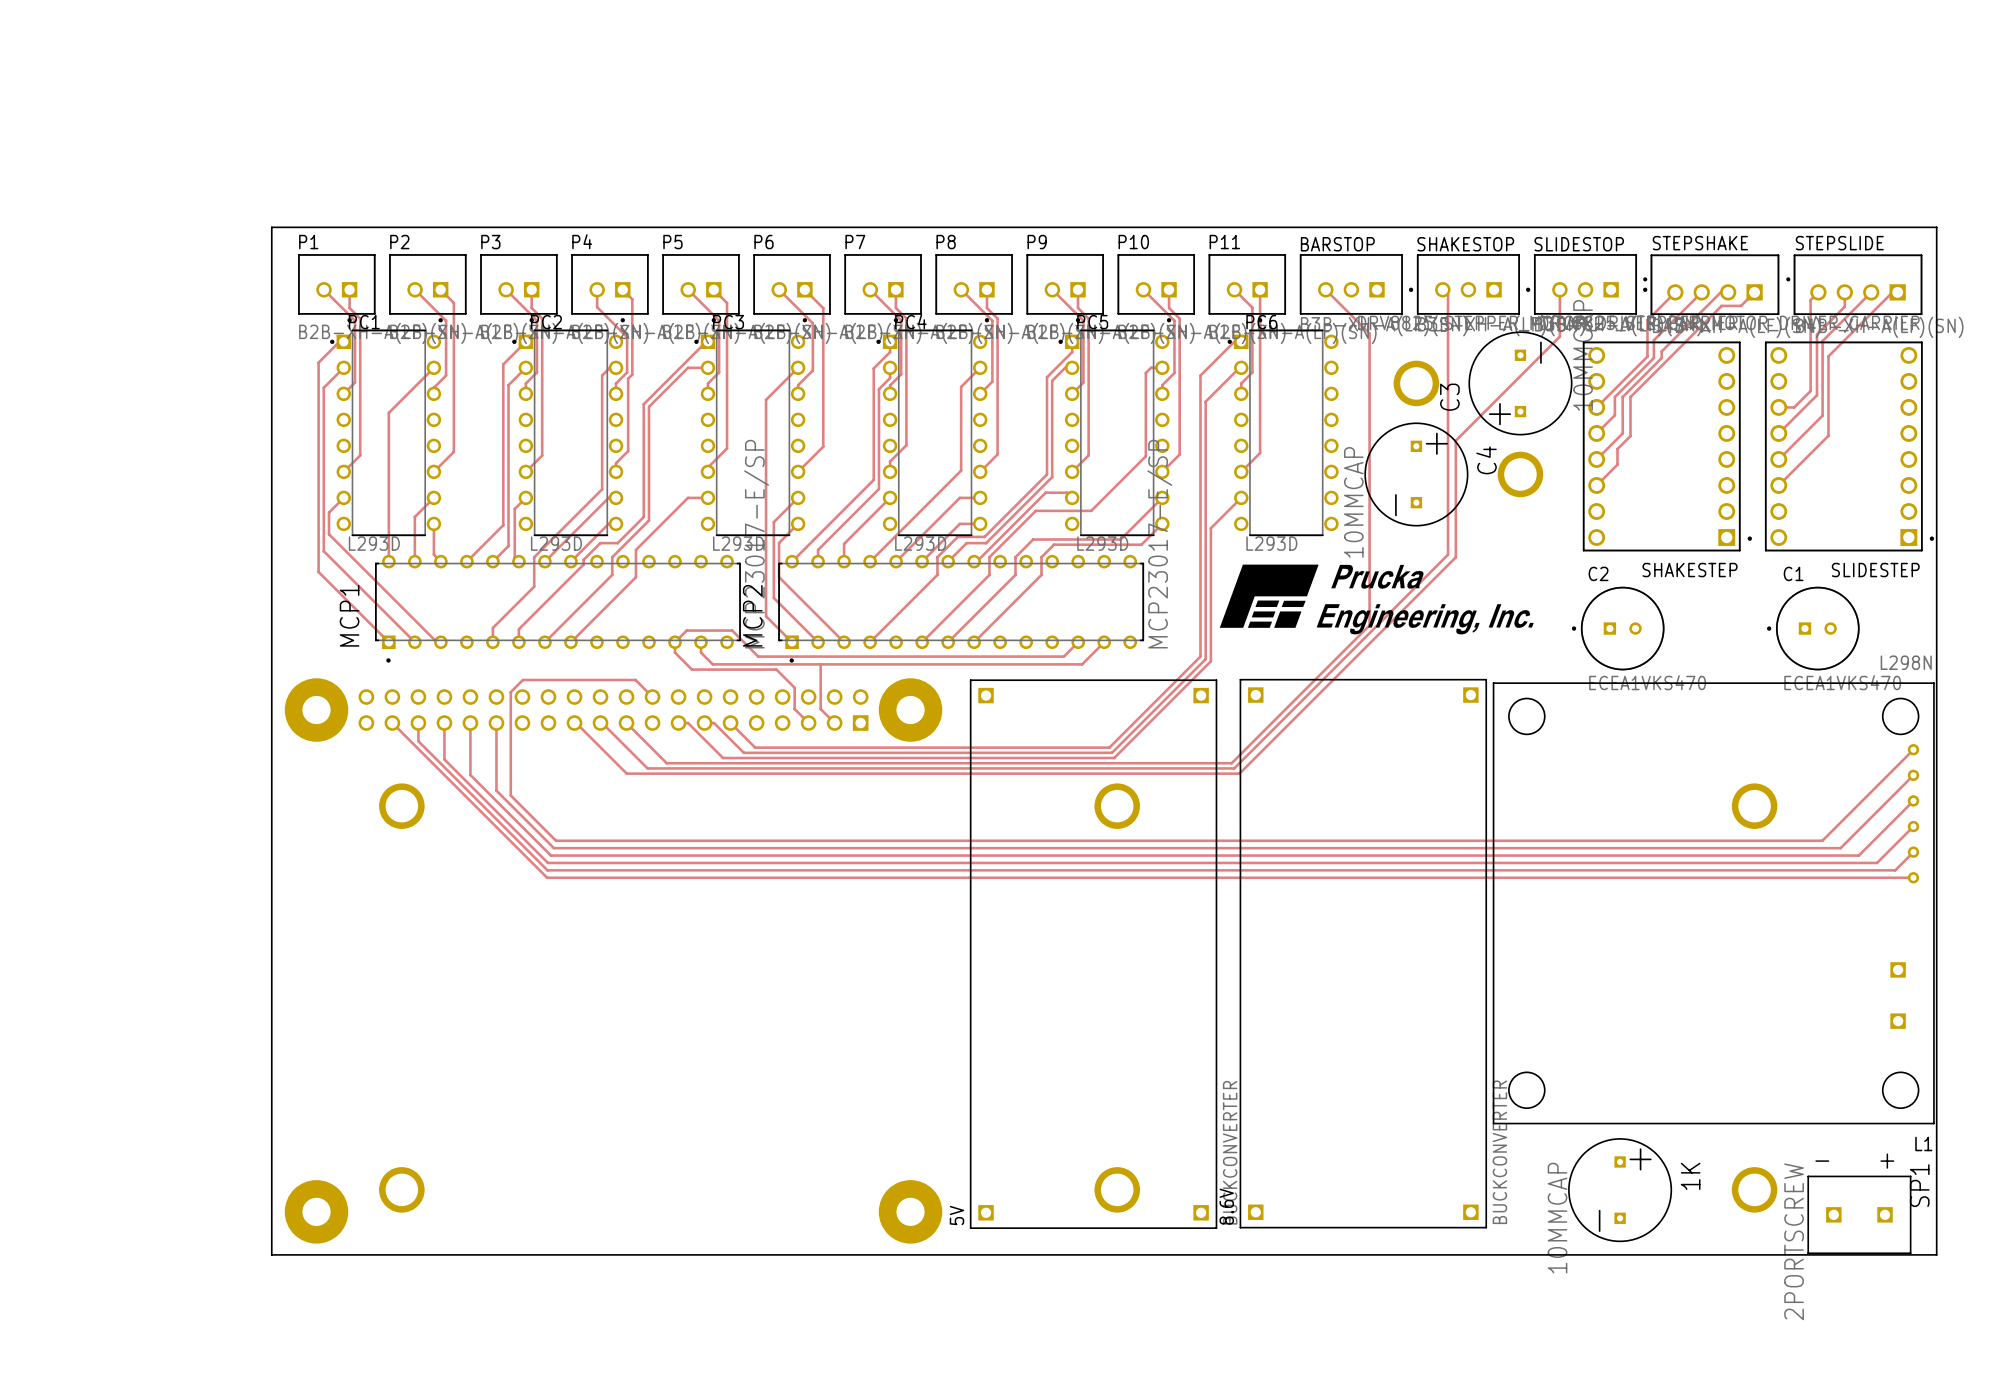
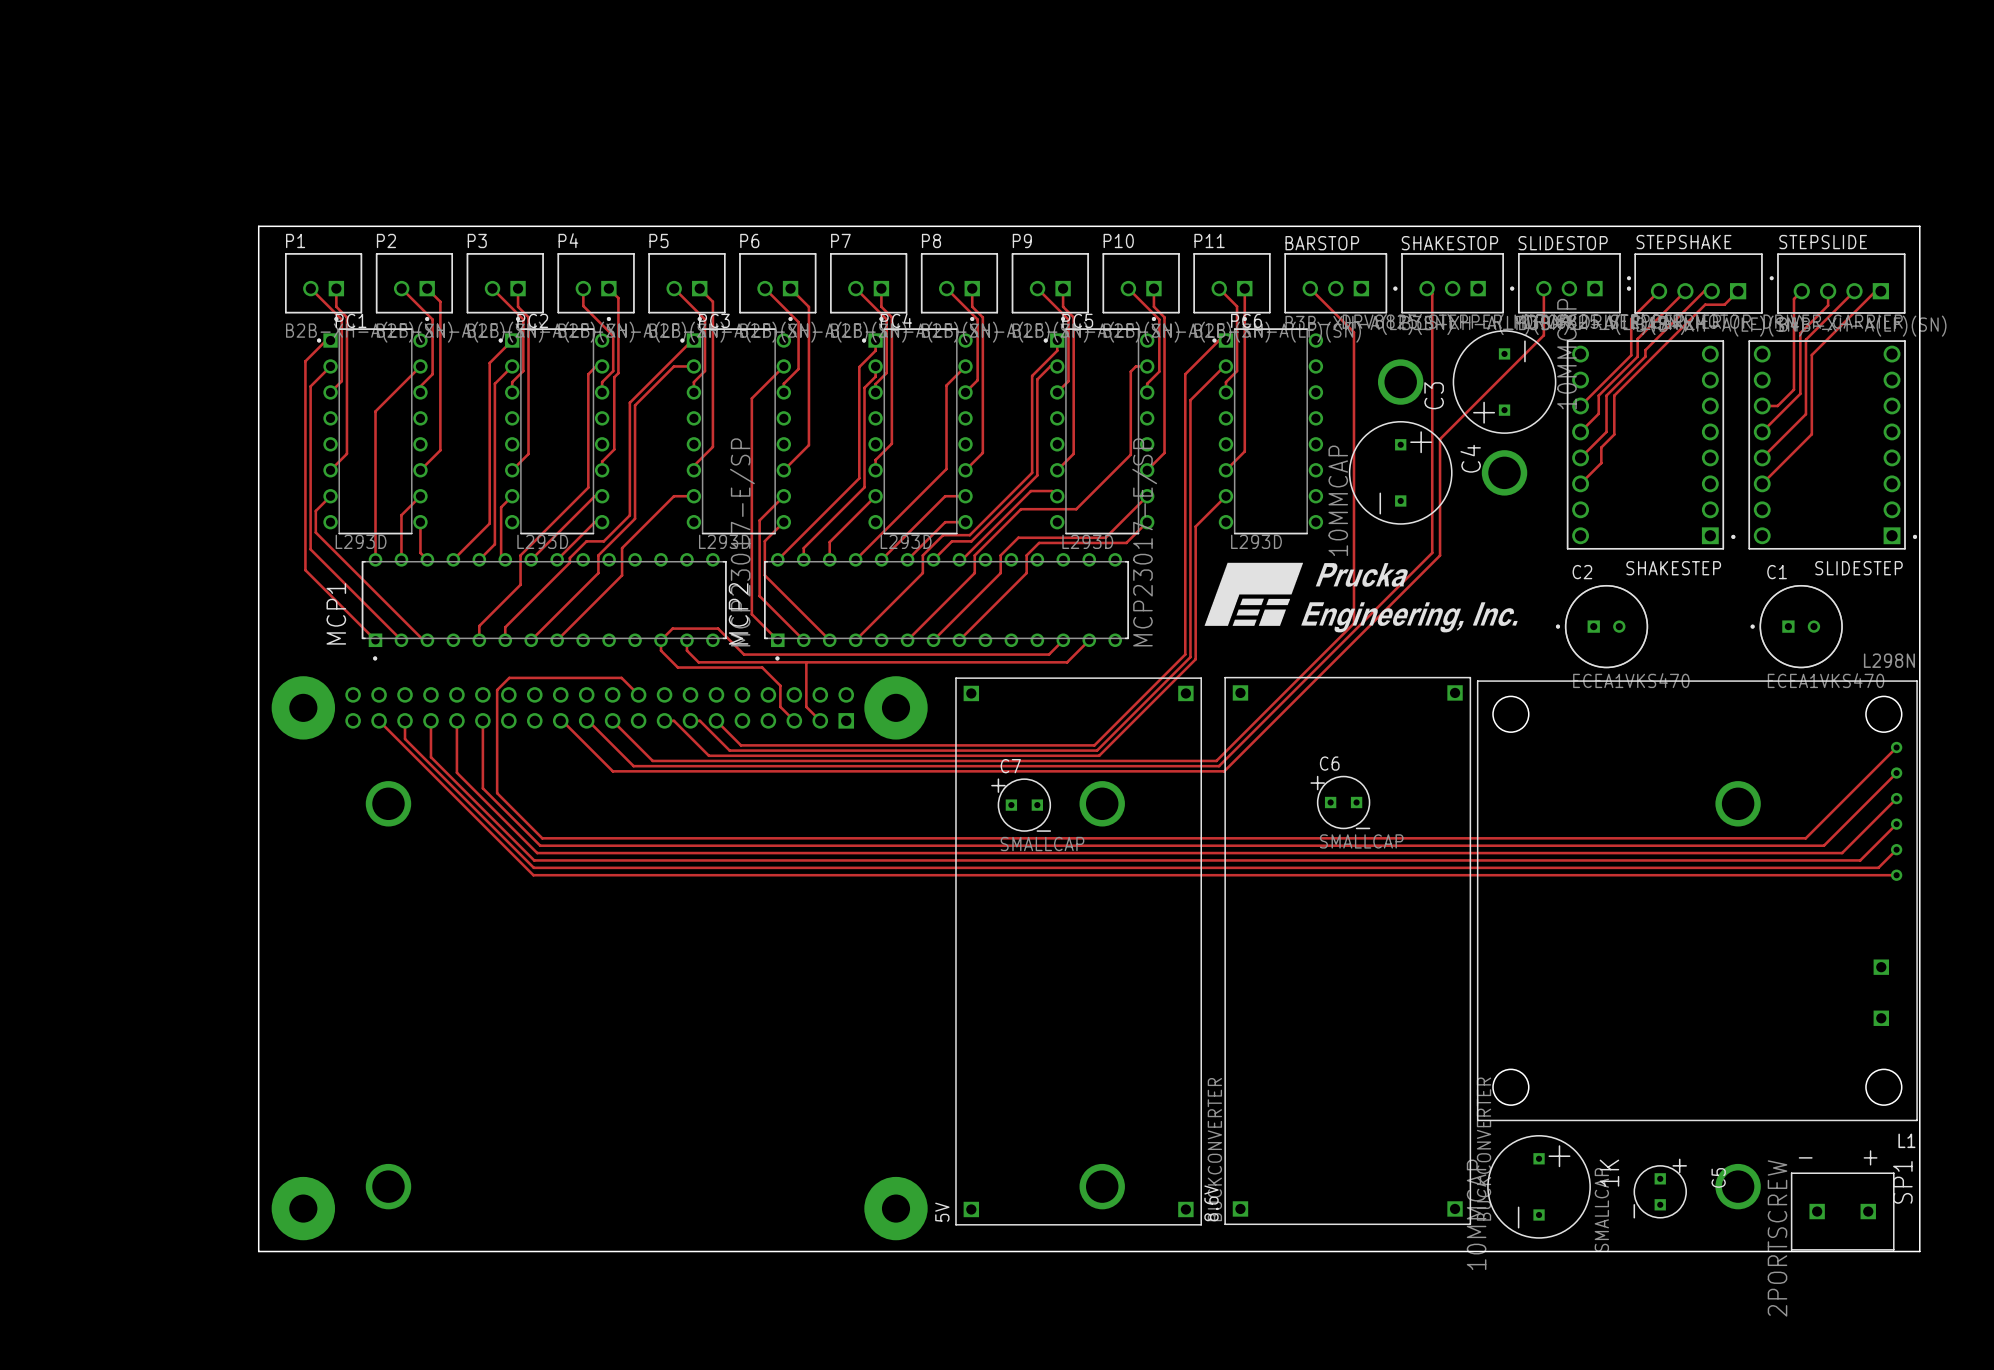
C6: none -> SMALLCAP (1340, 802)
C7: none -> SMALLCAP (1021, 805)
1K position: (1620, 1190) -> (1539, 1186)
C5: none -> SMALLCAP (1660, 1188)

